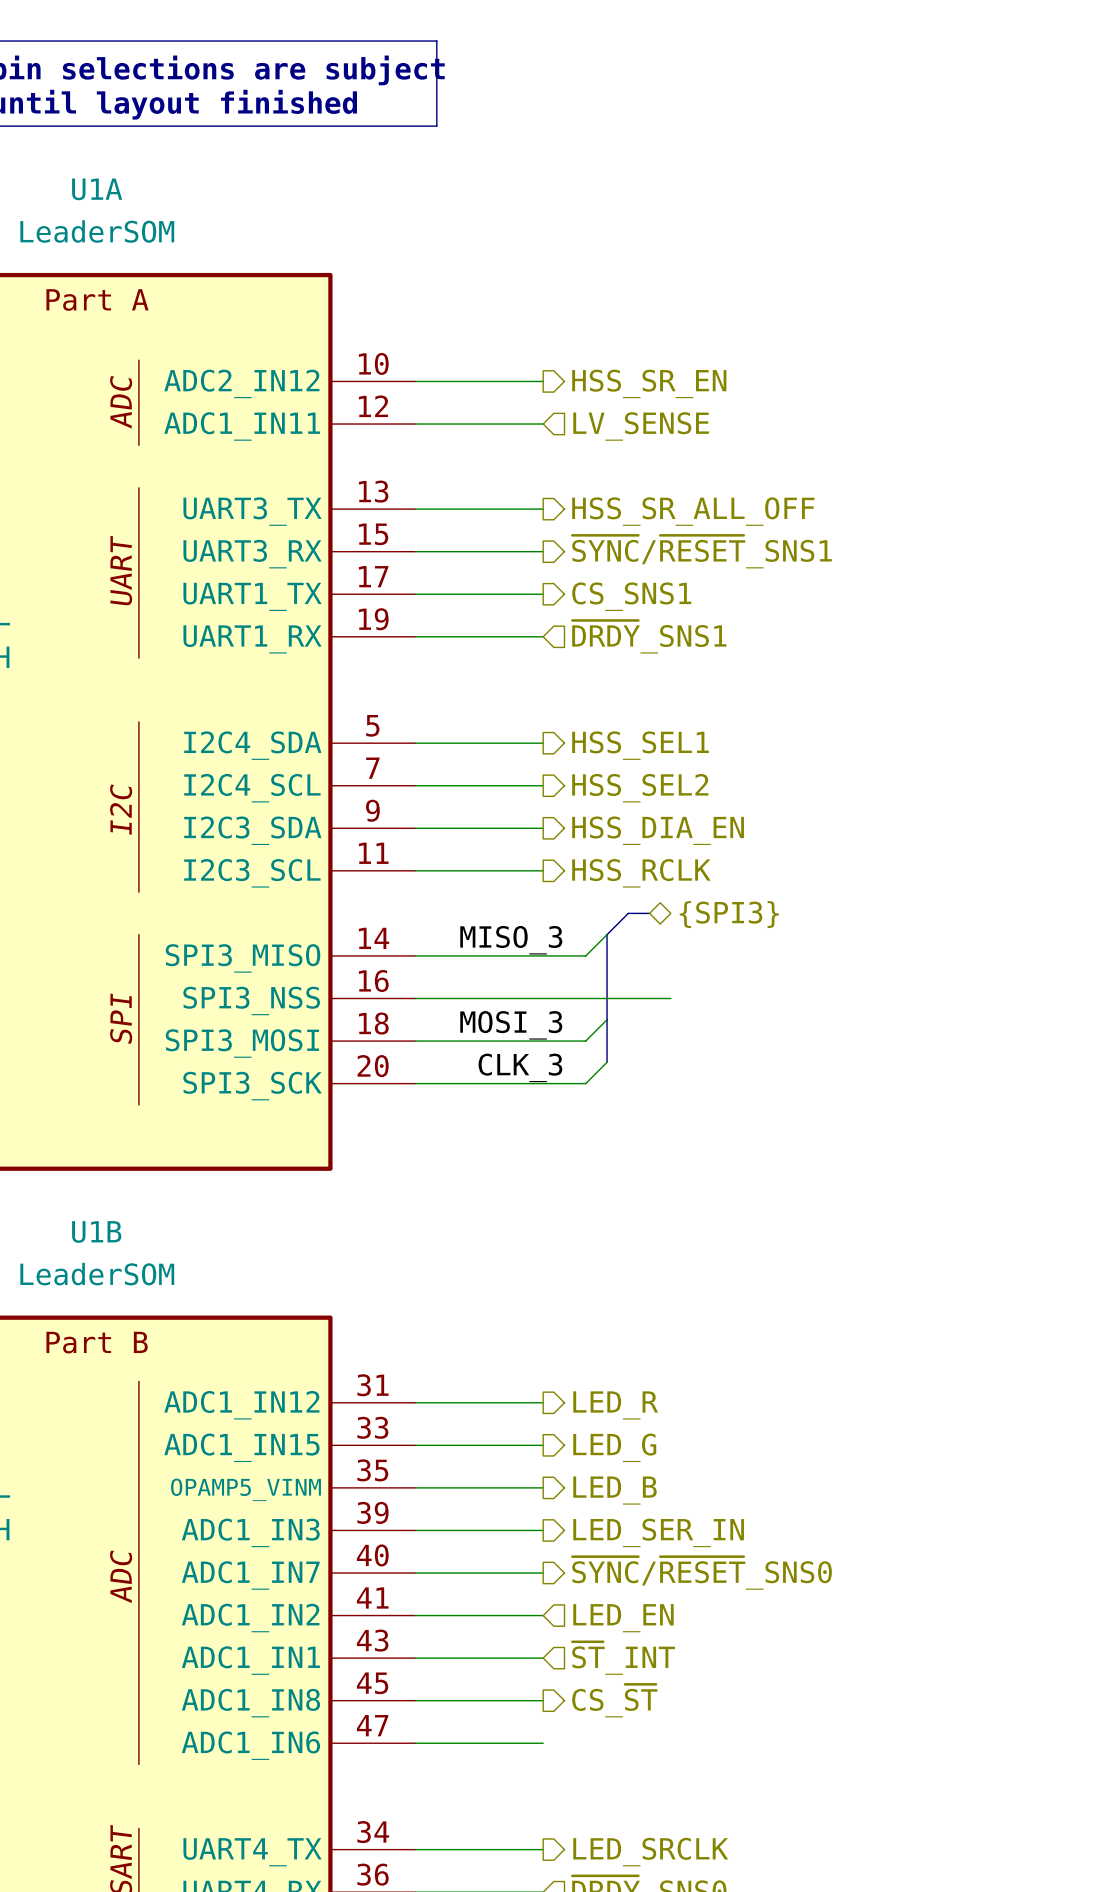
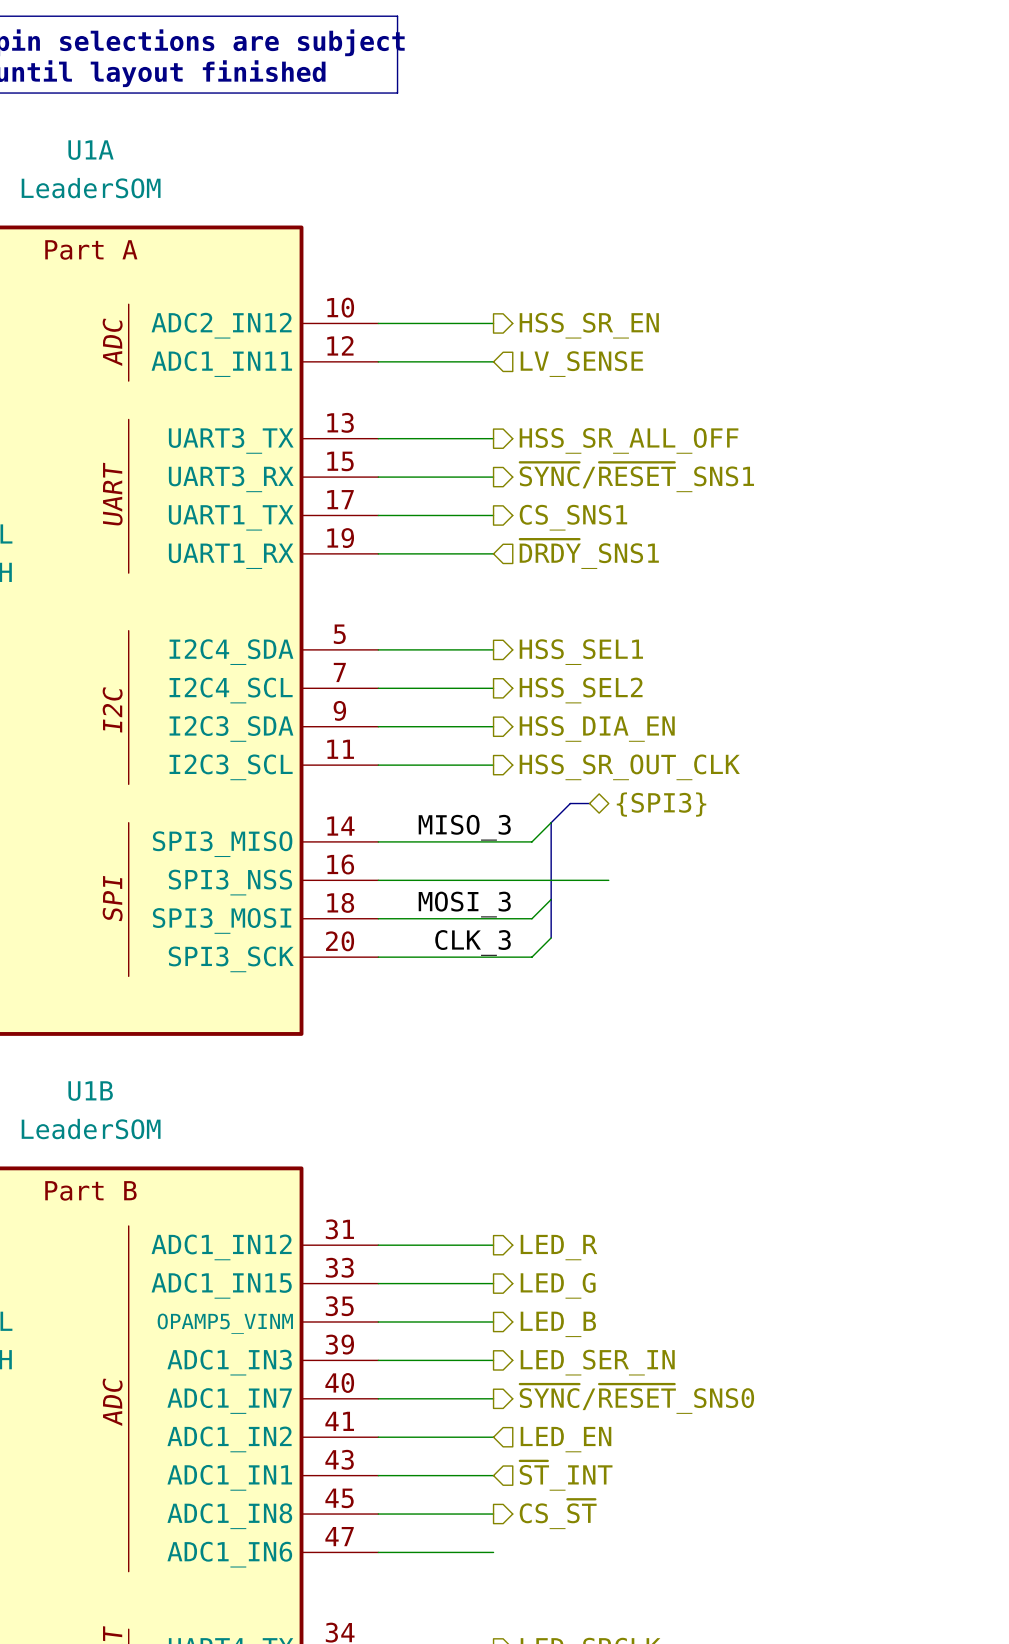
hierarchical label: HSS_RCLK (641, 873) -> HSS_SR_OUT_CLK (629, 767)

